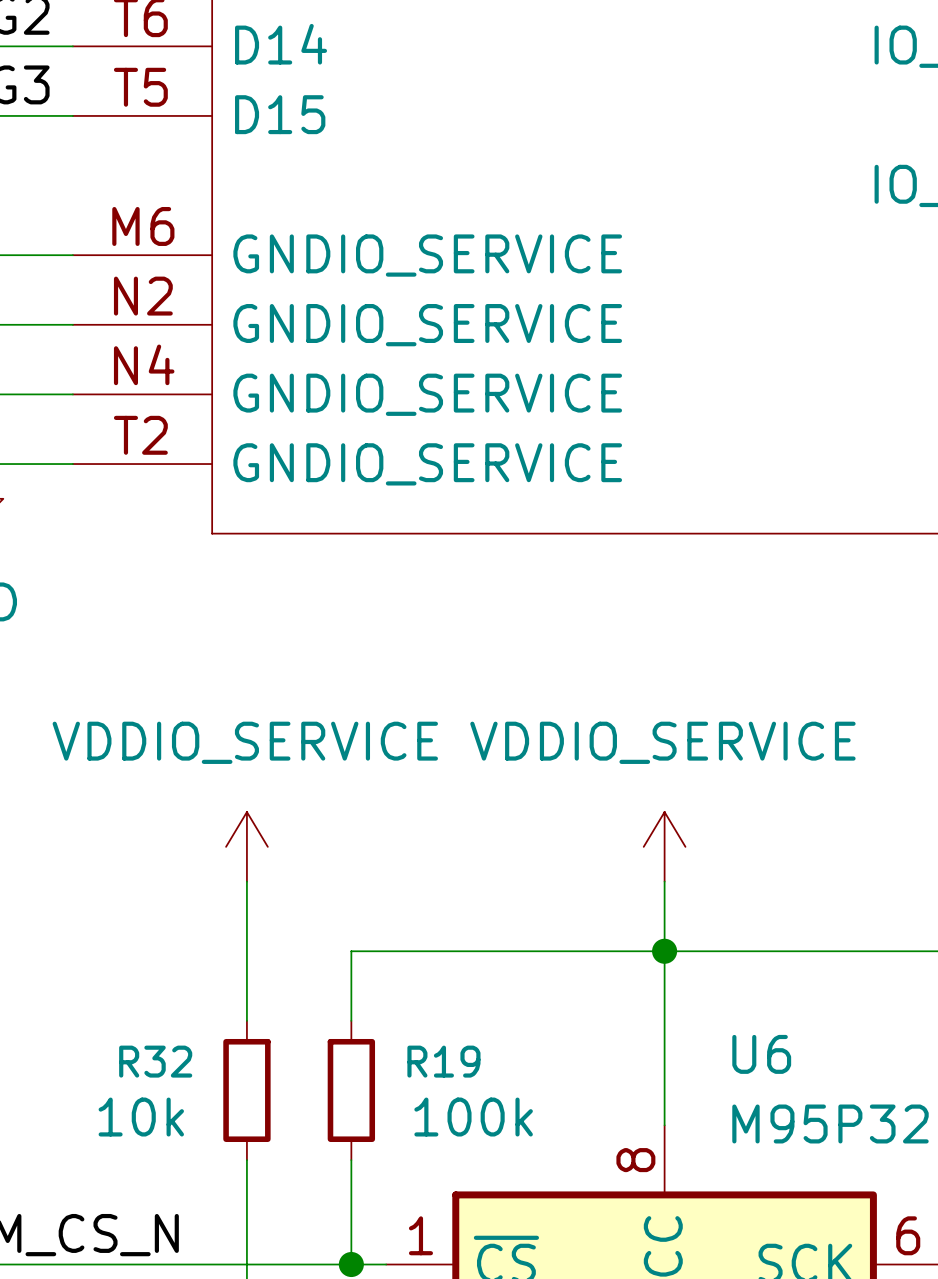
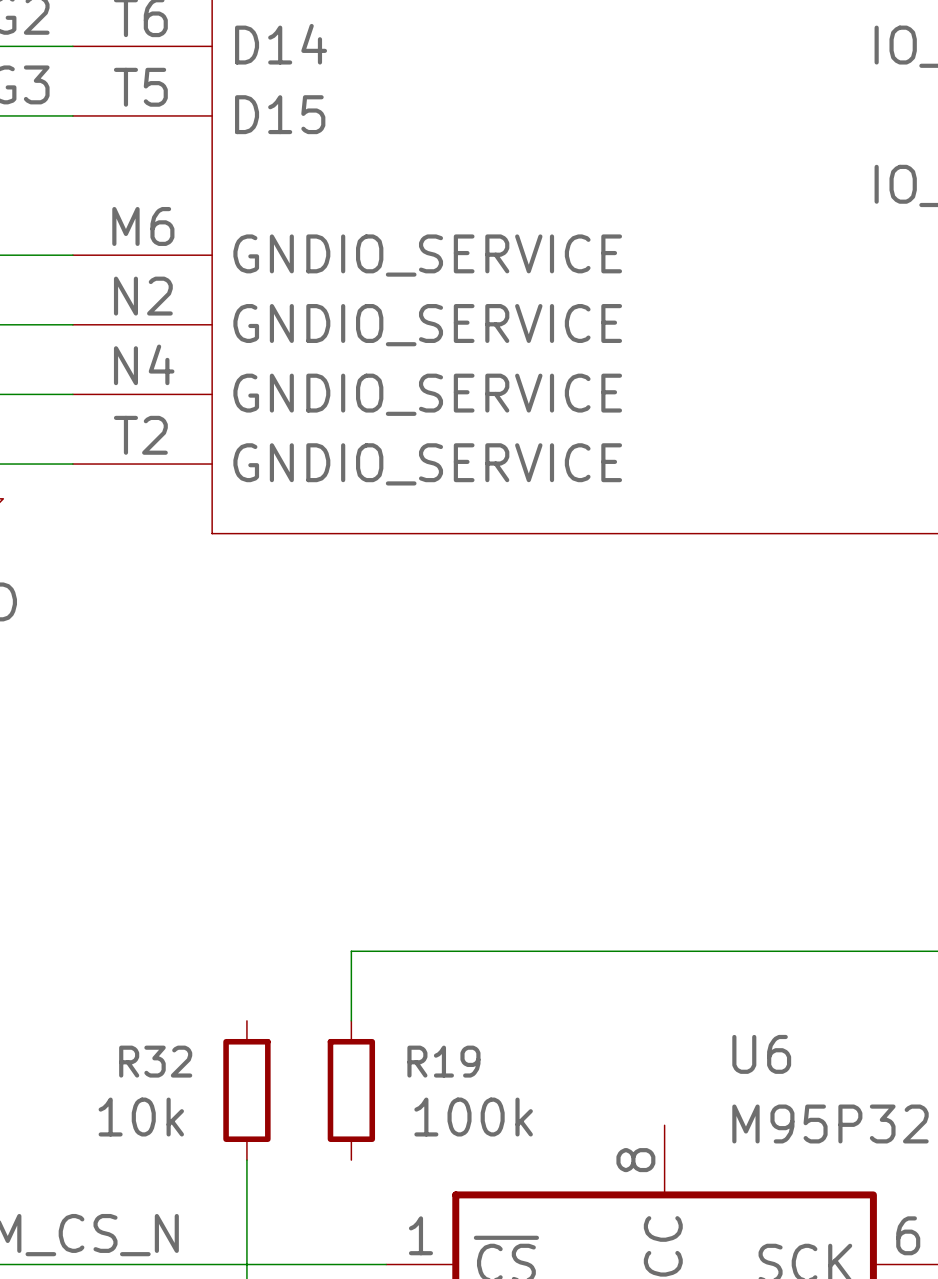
power symbol: VDDIO_SERVICE (246, 846) -> none
power symbol: VDDIO_SERVICE (664, 846) -> none
wire: (246, 881) (246, 1020) -> none
wire: (664, 881) (664, 1125) -> none
junction: (664, 951) -> none
wire: (351, 1160) (351, 1264) -> none
junction: (351, 1264) -> none

